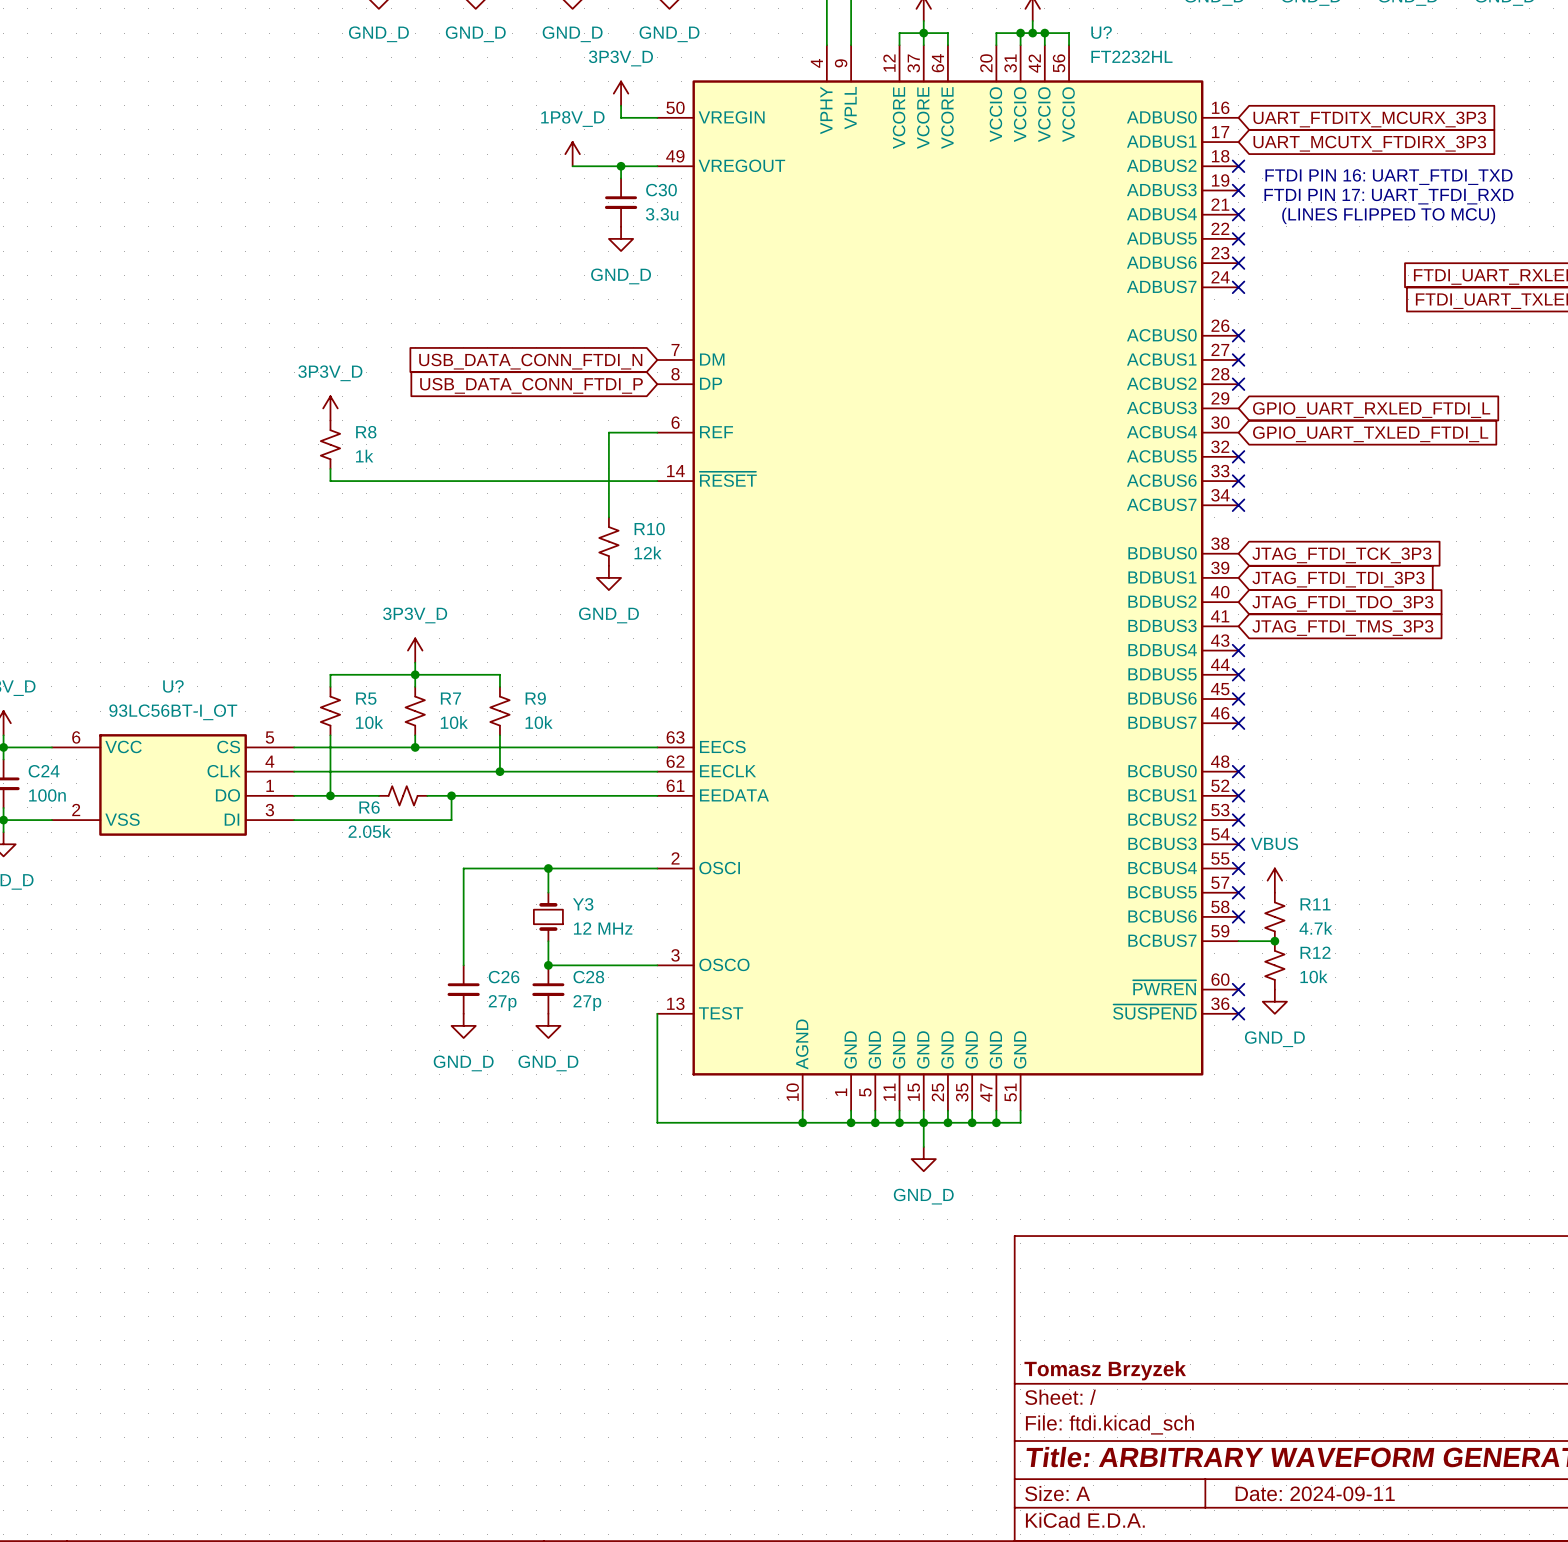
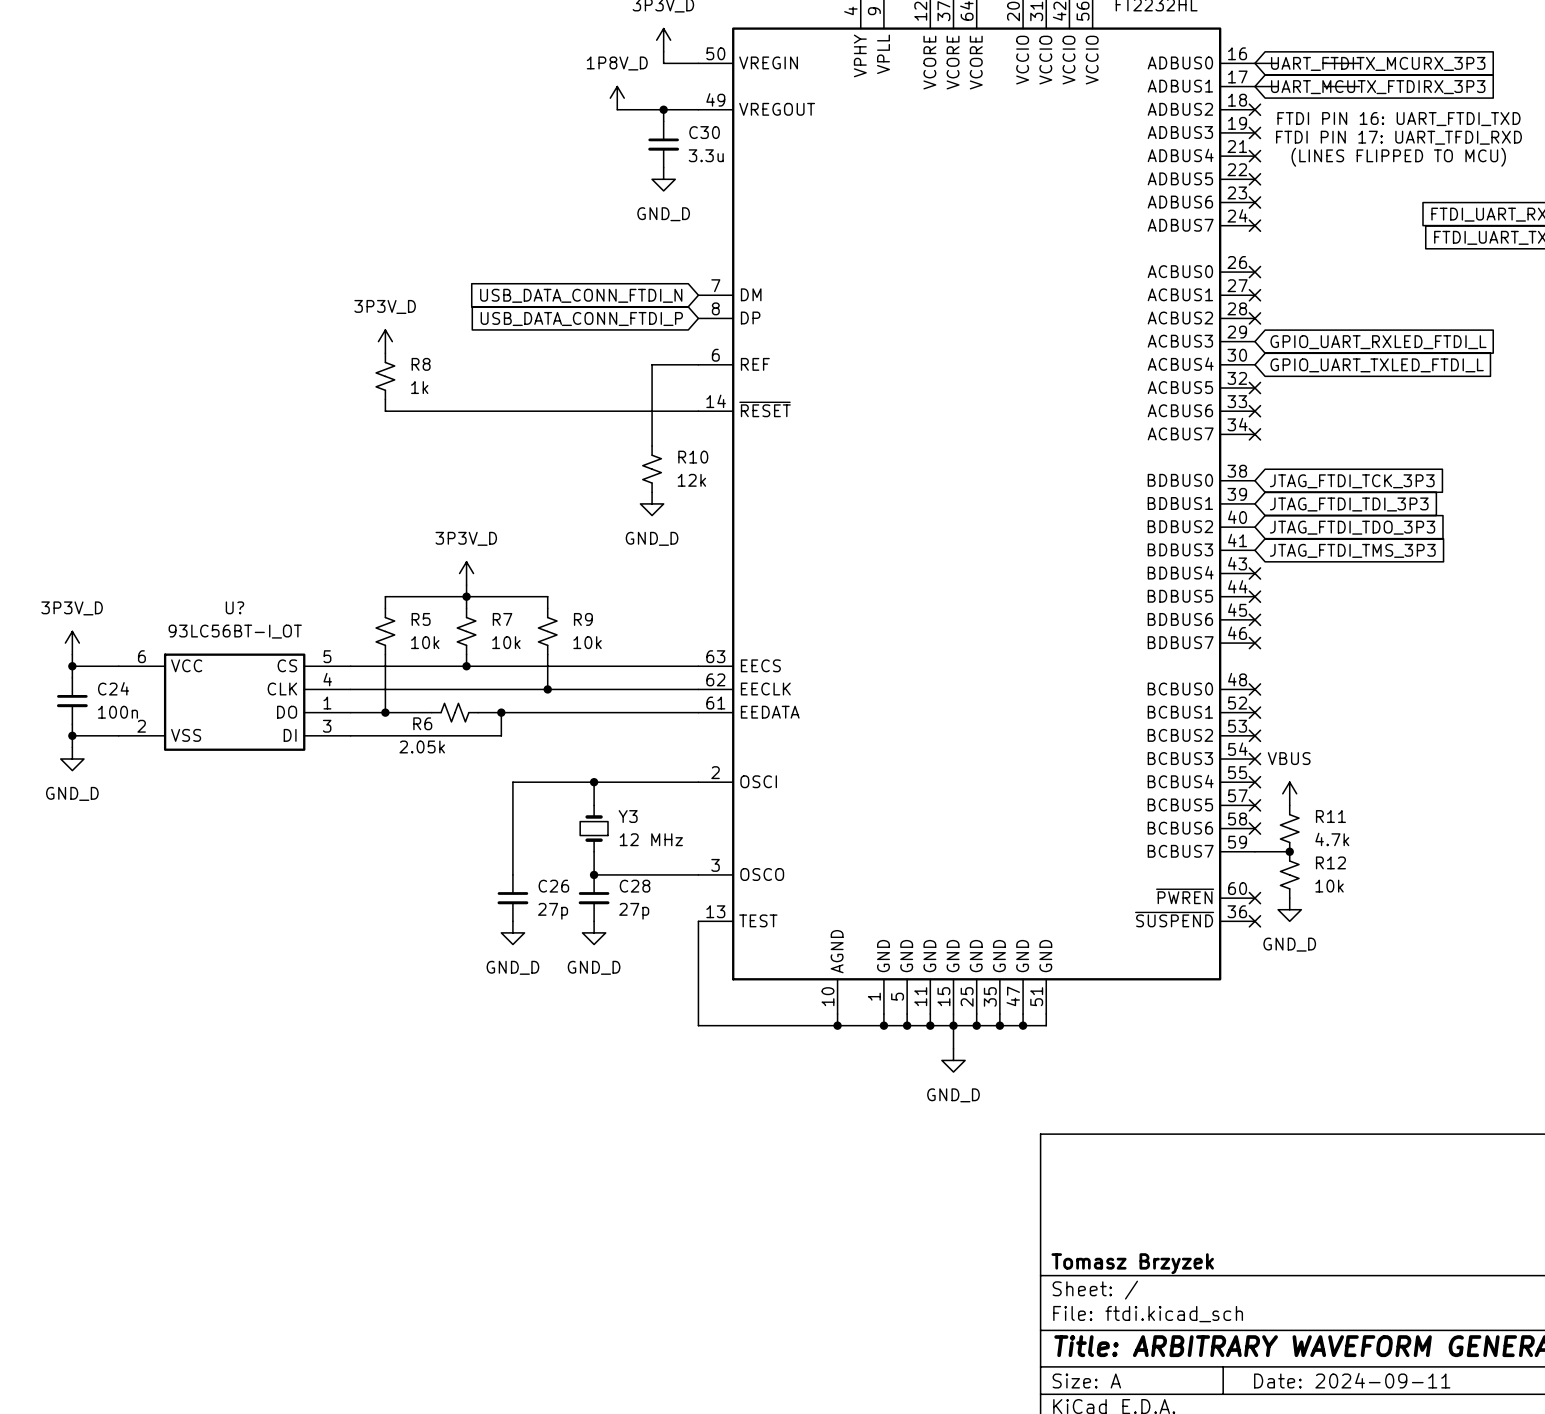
wire: none -> (1254, 63) (1278, 63)
wire: none -> (1324, 63) (1359, 63)
wire: none -> (1254, 86) (1278, 86)
wire: none -> (1324, 86) (1359, 86)

